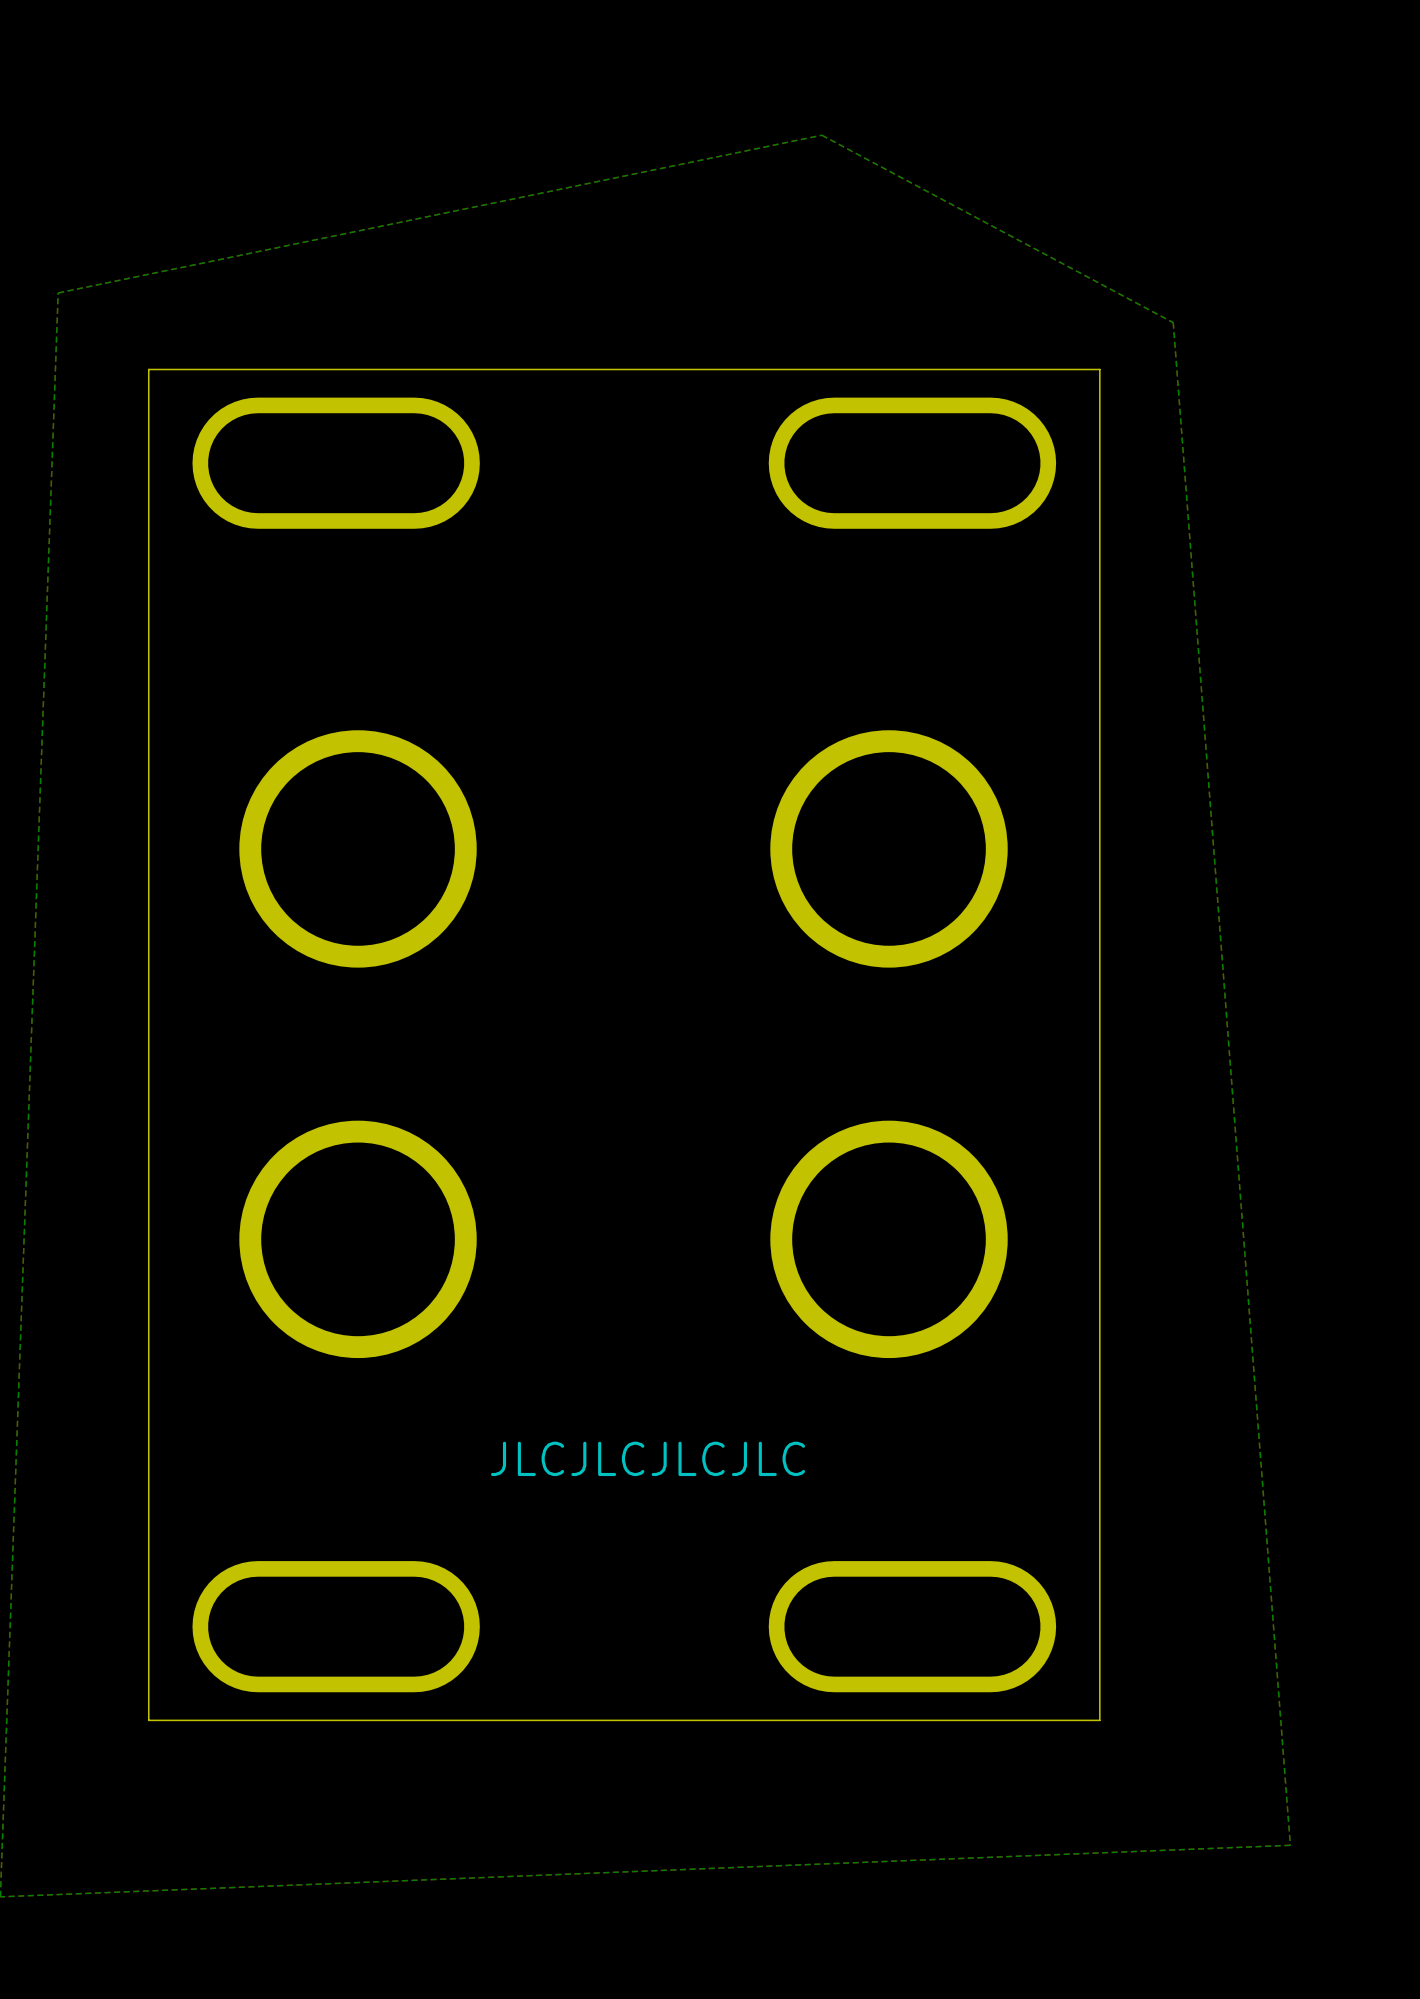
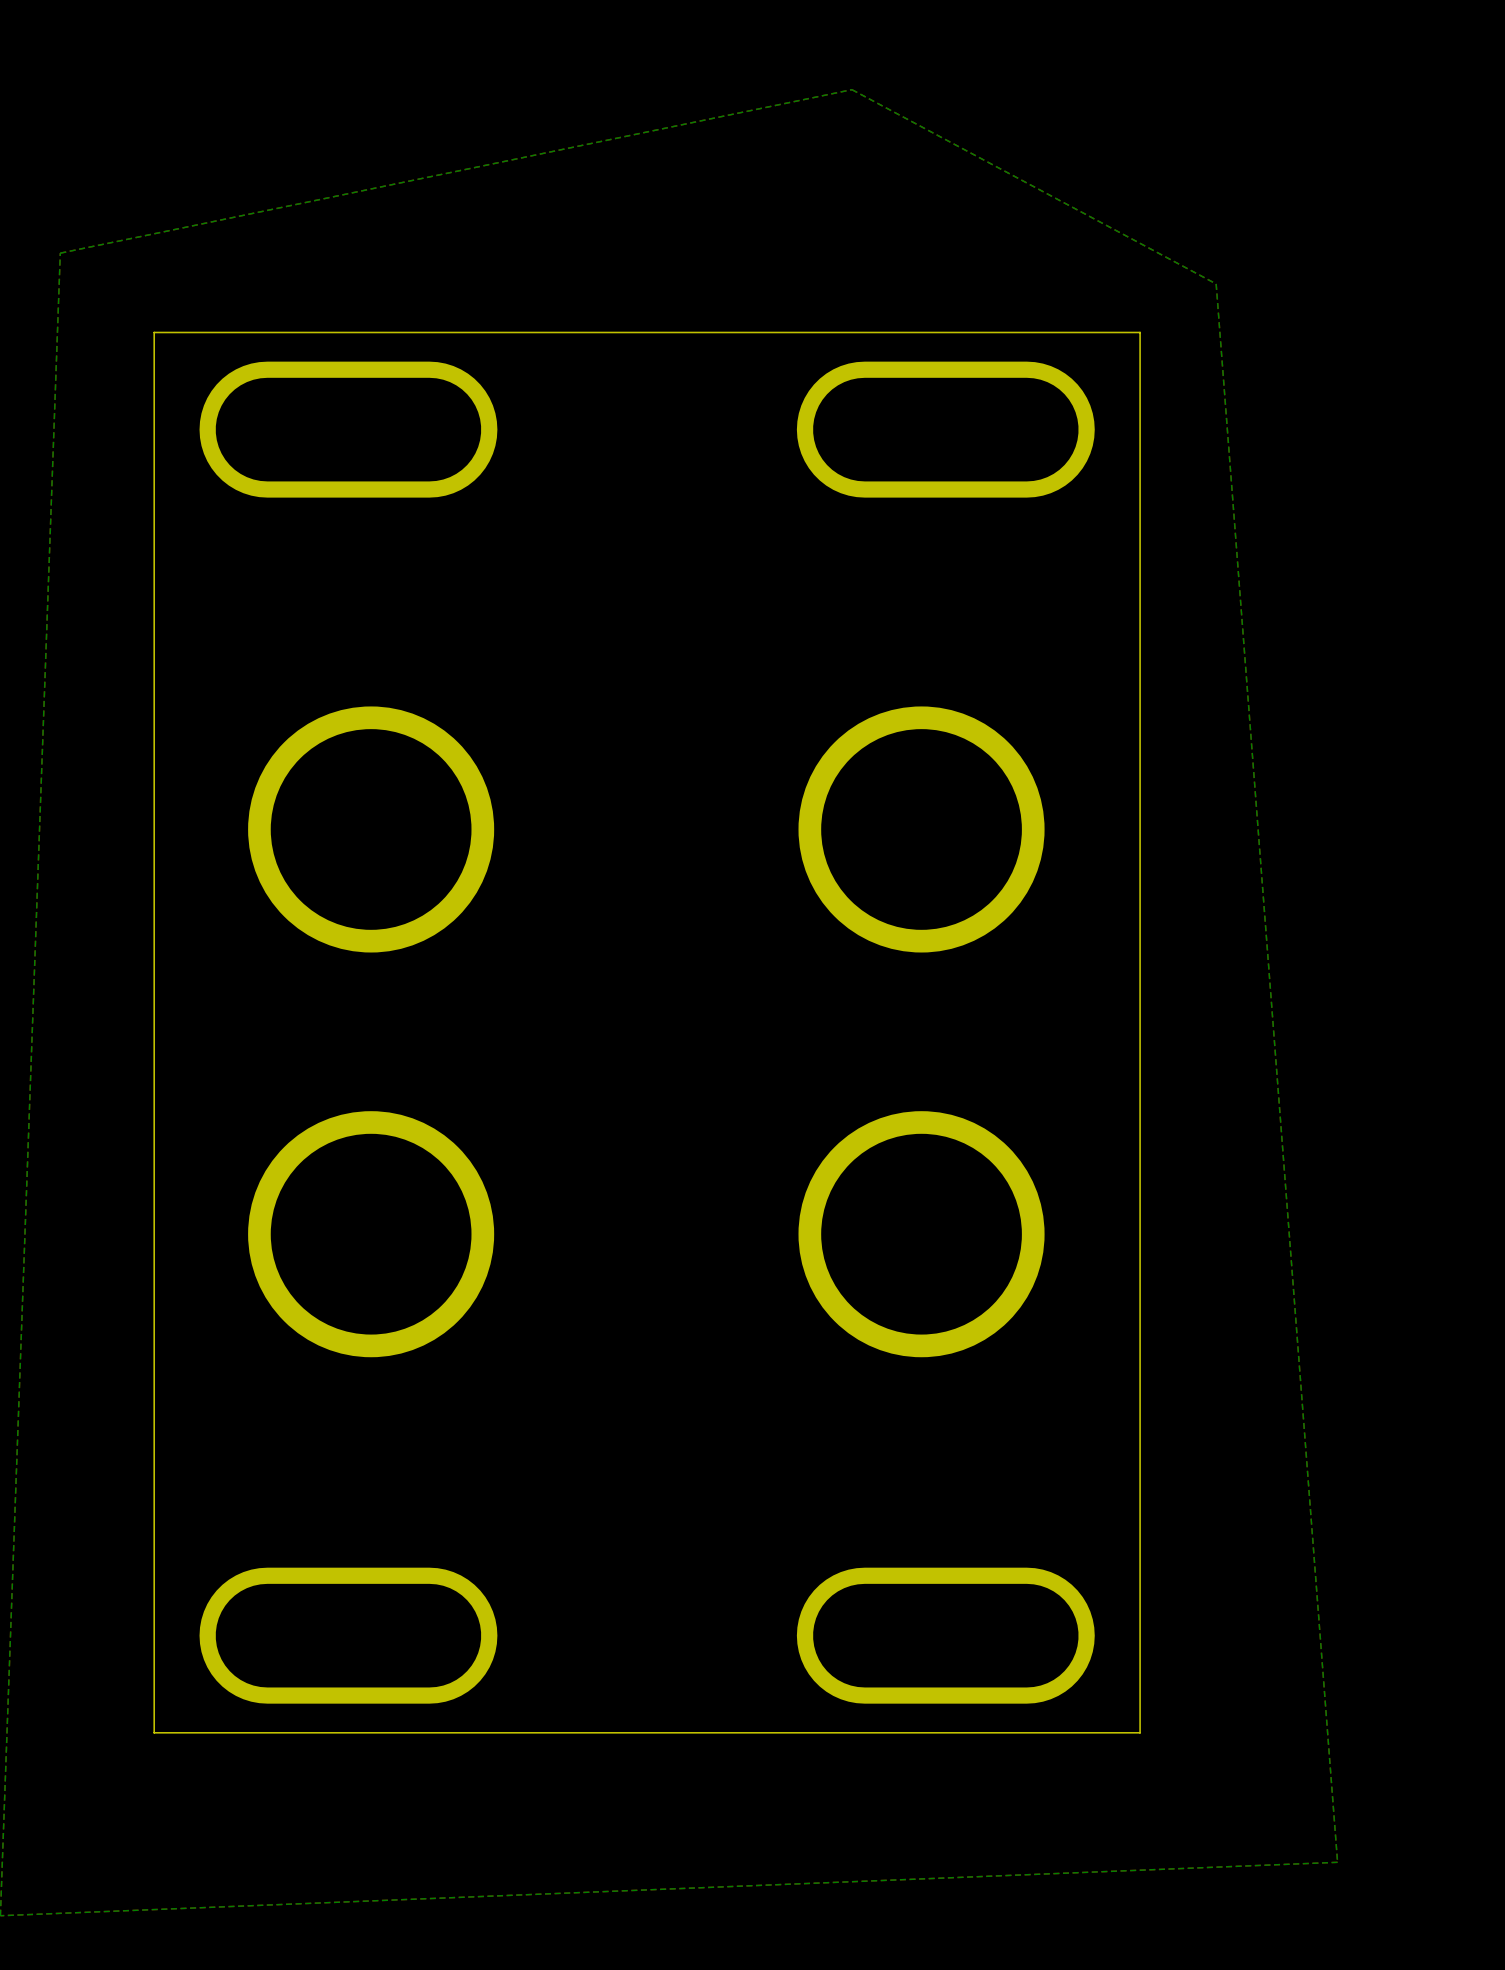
text: JLCJLCJLCJLC (648, 1458) -> none

